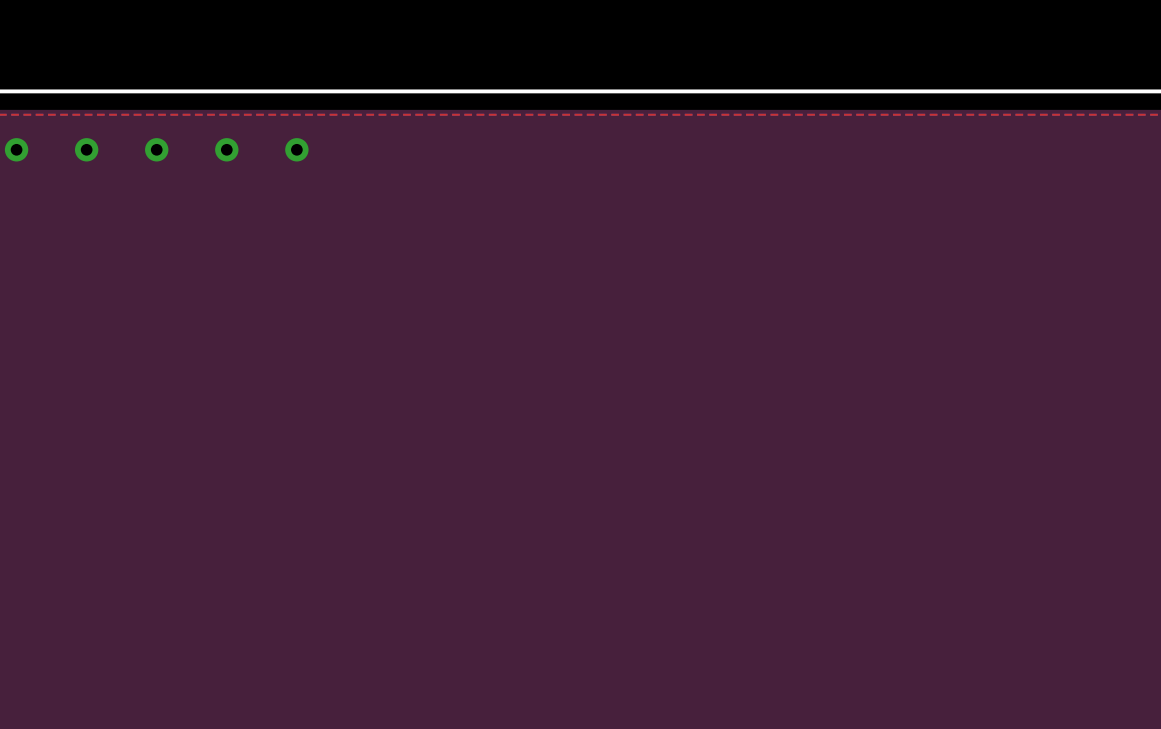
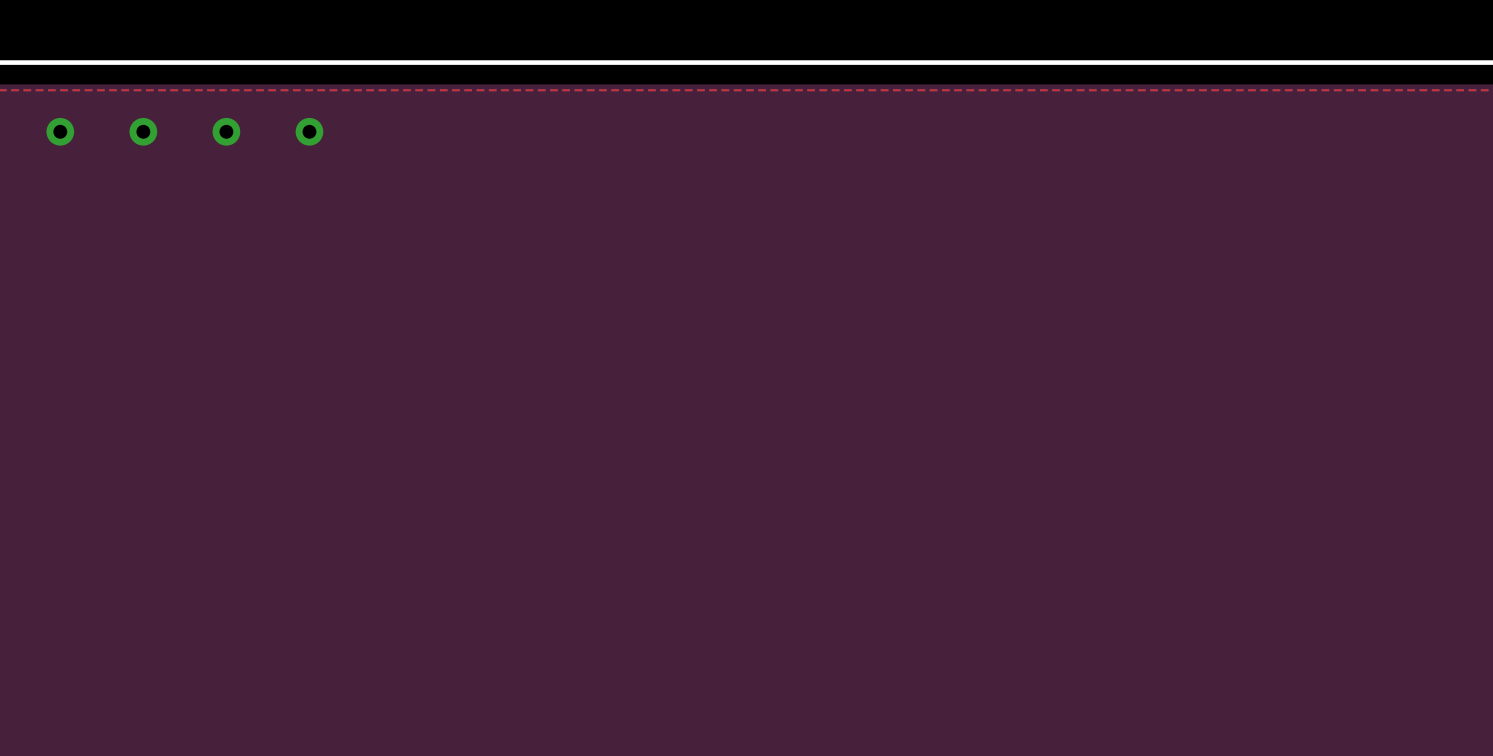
via: (296, 149) -> none

